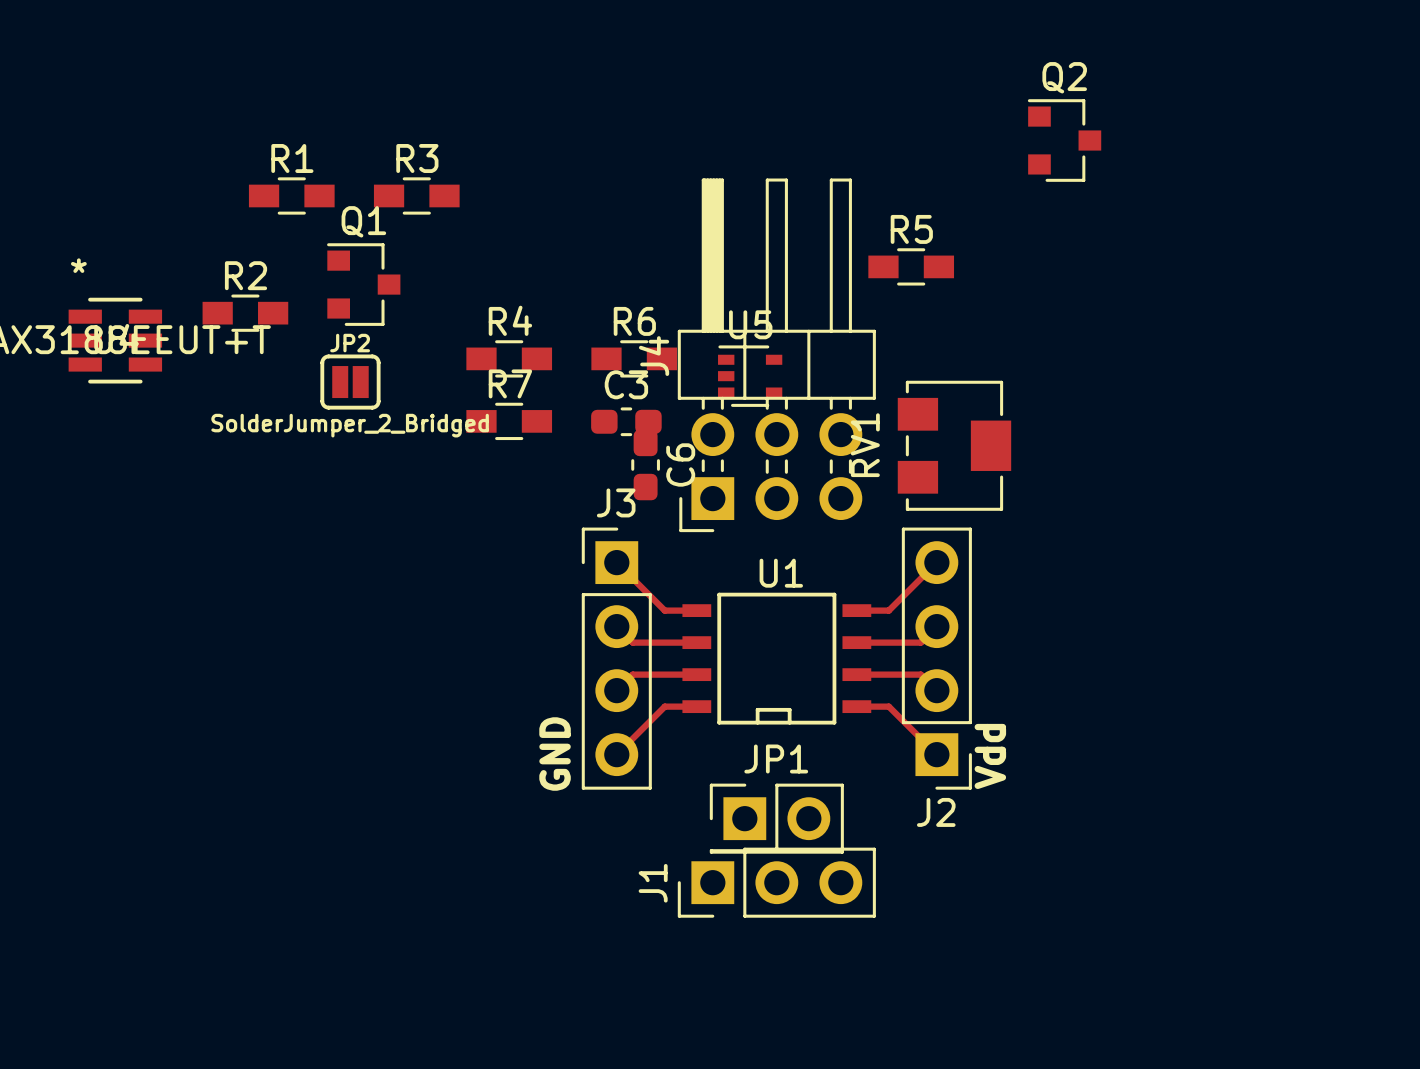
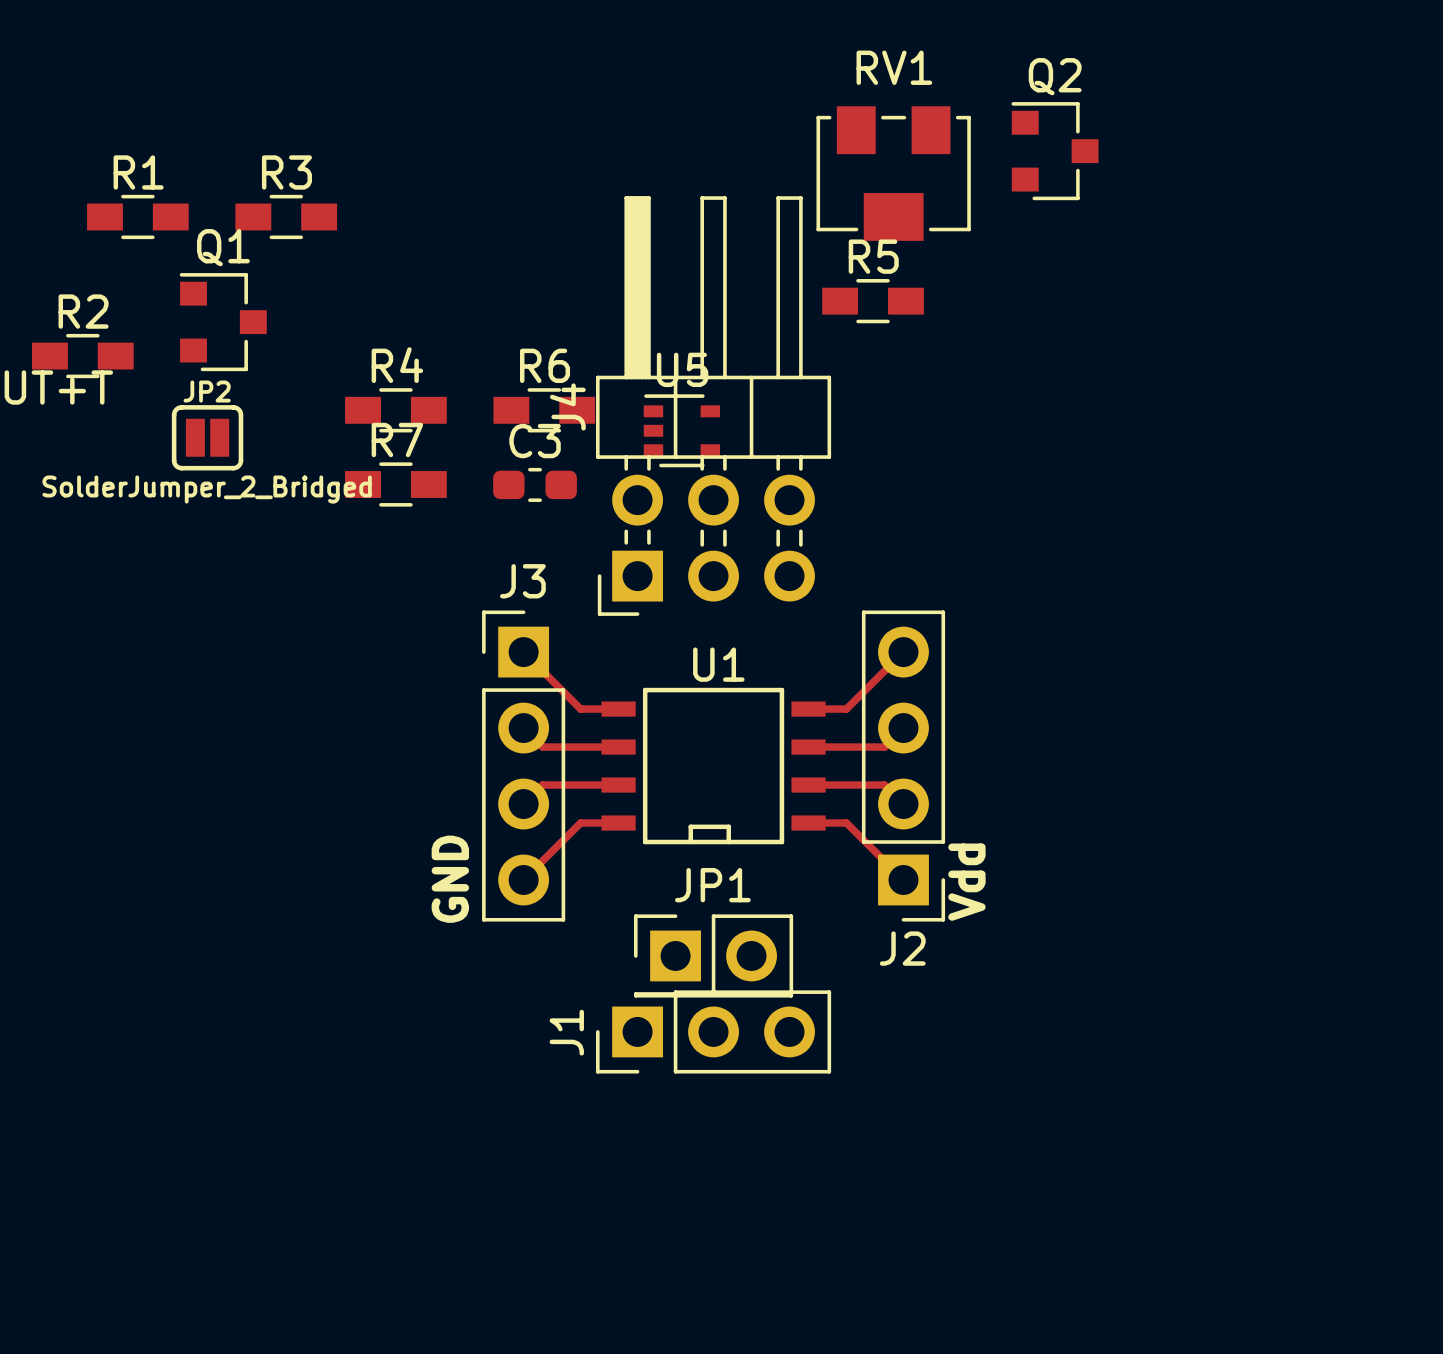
RV1 rotation: 0° (954, 445) -> 90° clockwise (893, 173)
RV1 position: (954, 445) -> (893, 173)
C6: (645, 464) -> none

